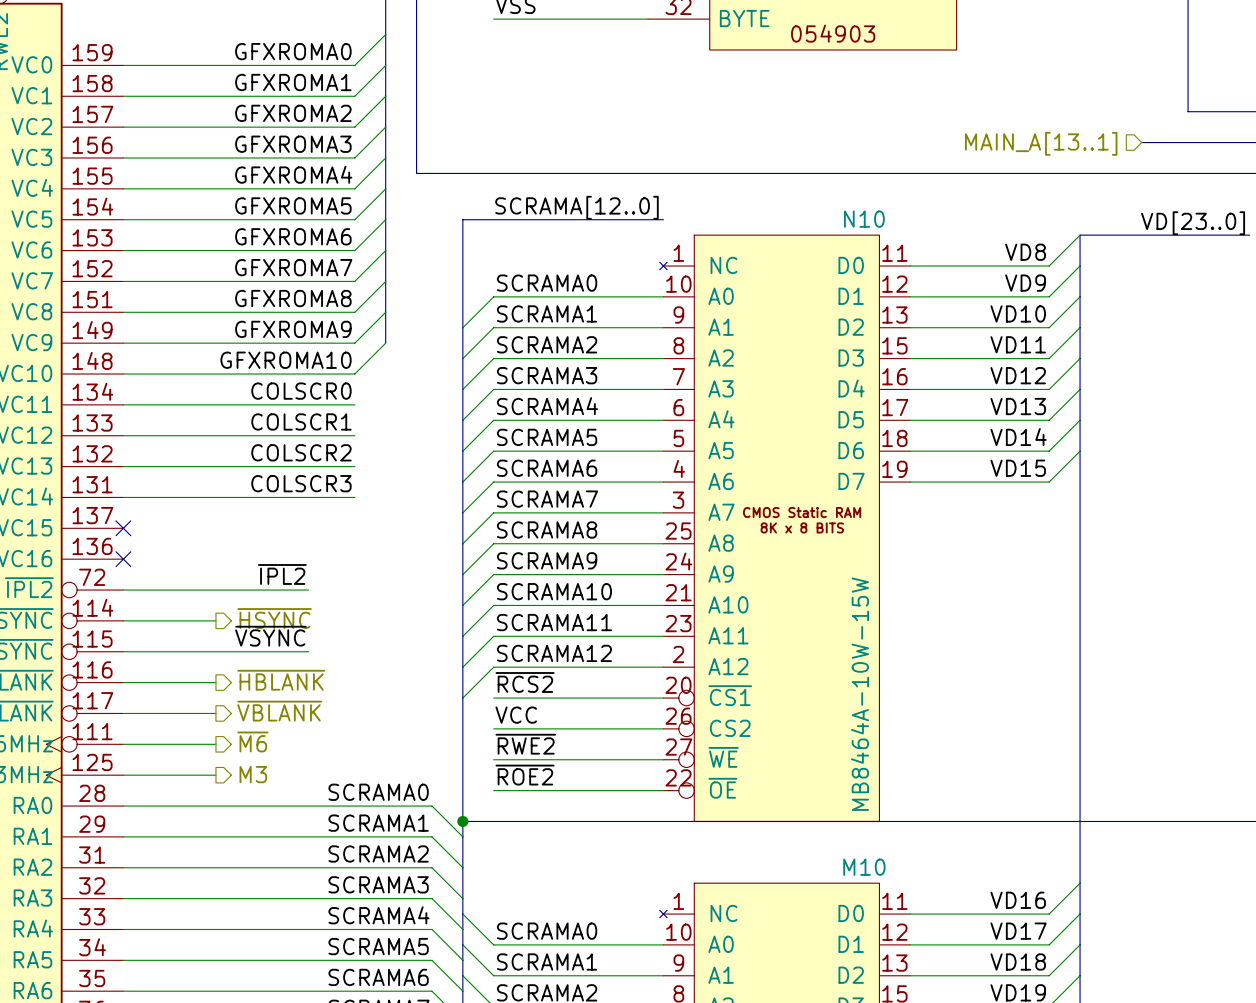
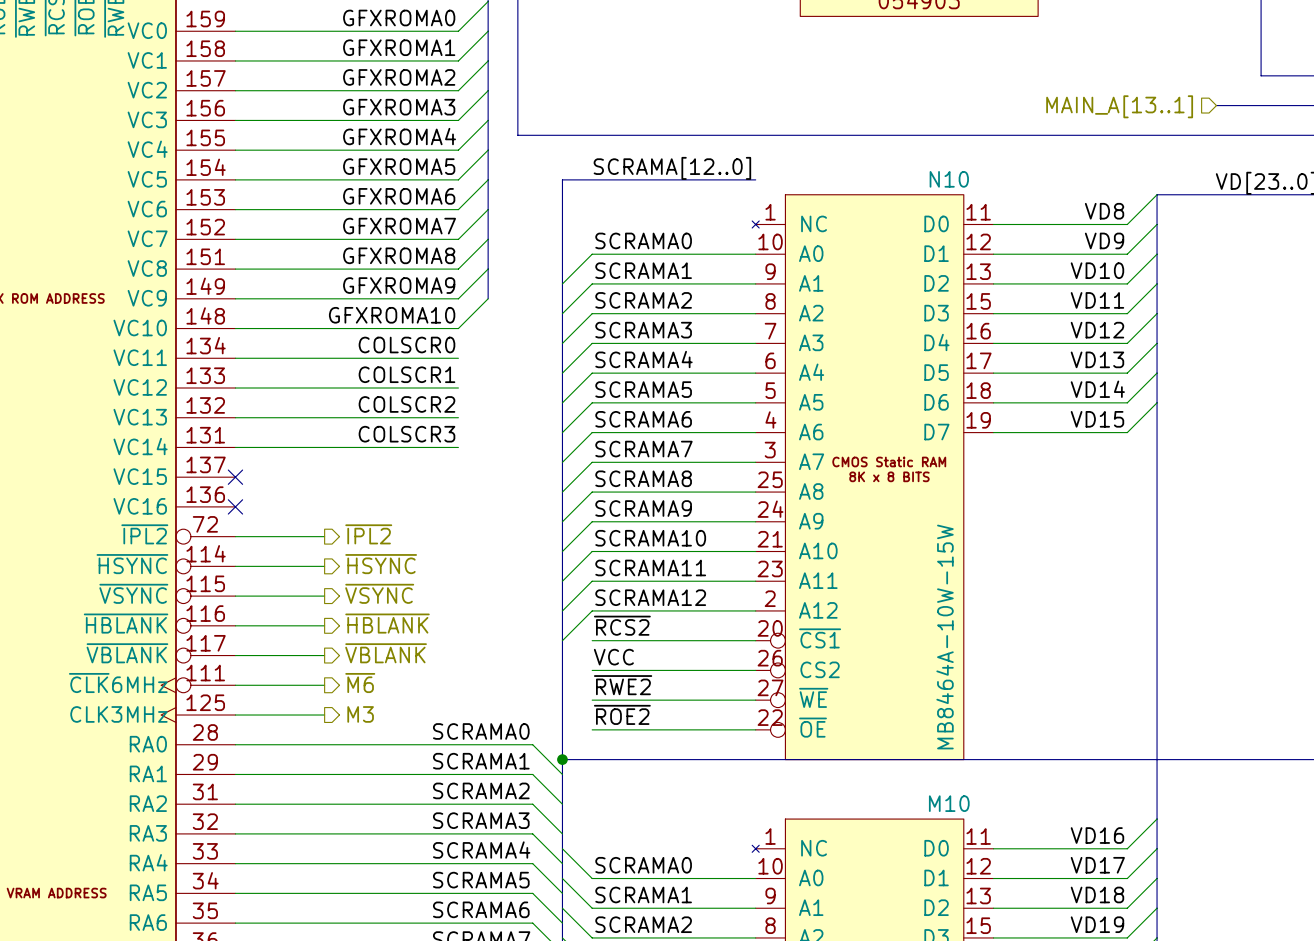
label: ~{IPL2} (282, 574) -> none
hierarchical label: none -> ~{IPL2} (368, 534)
wire: (215, 590) (308, 590) -> none
label: ~{VSYNC} (270, 636) -> none
hierarchical label: none -> ~{VSYNC} (379, 593)
wire: (215, 651) (308, 651) -> none

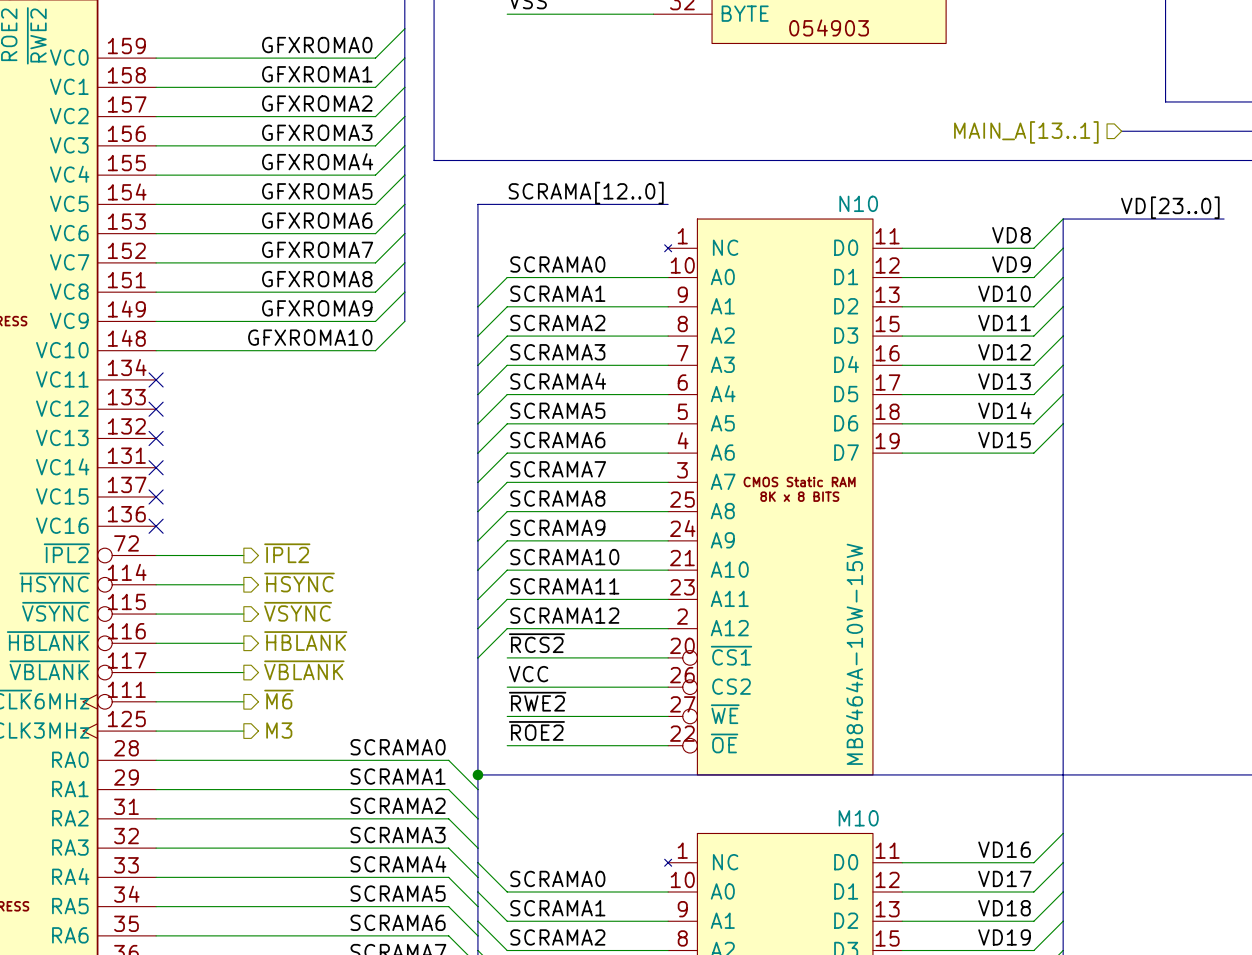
label: COLSCR0 (406, 345) -> none
wire: (235, 358) (458, 358) -> none
no-connect mark: none -> (156, 379)
label: COLSCR1 (406, 374) -> none
wire: (235, 388) (458, 388) -> none
no-connect mark: none -> (156, 409)
label: COLSCR2 (406, 404) -> none
wire: (235, 417) (458, 417) -> none
no-connect mark: none -> (156, 438)
label: COLSCR3 (406, 434) -> none
wire: (235, 447) (458, 447) -> none
no-connect mark: none -> (156, 467)

